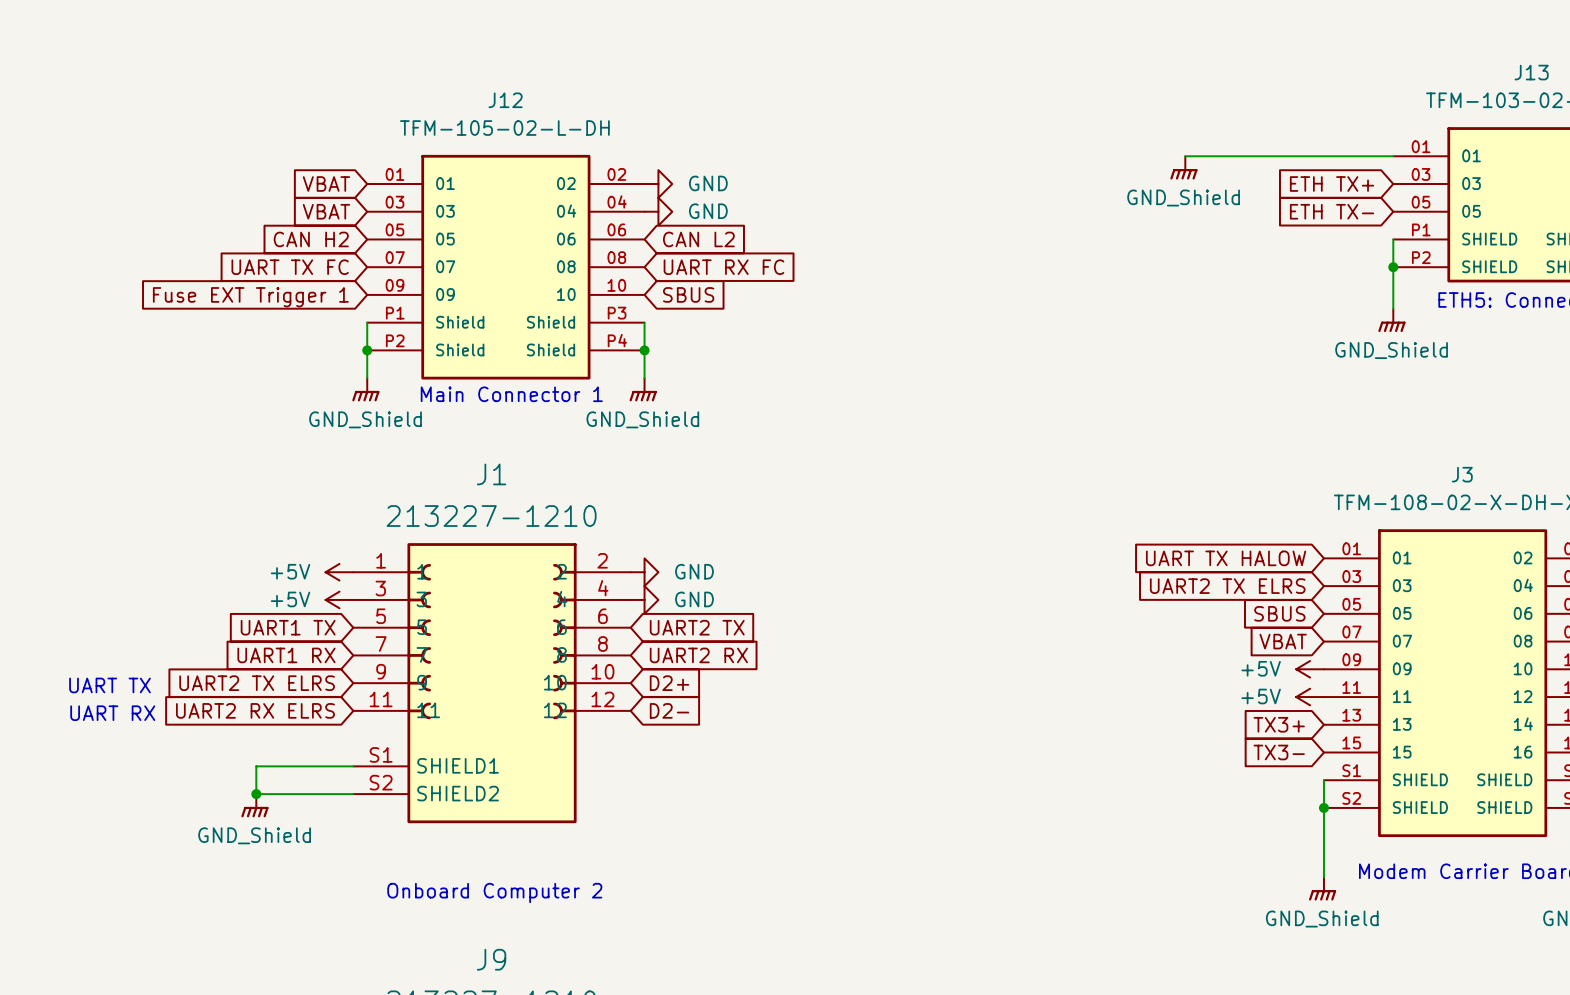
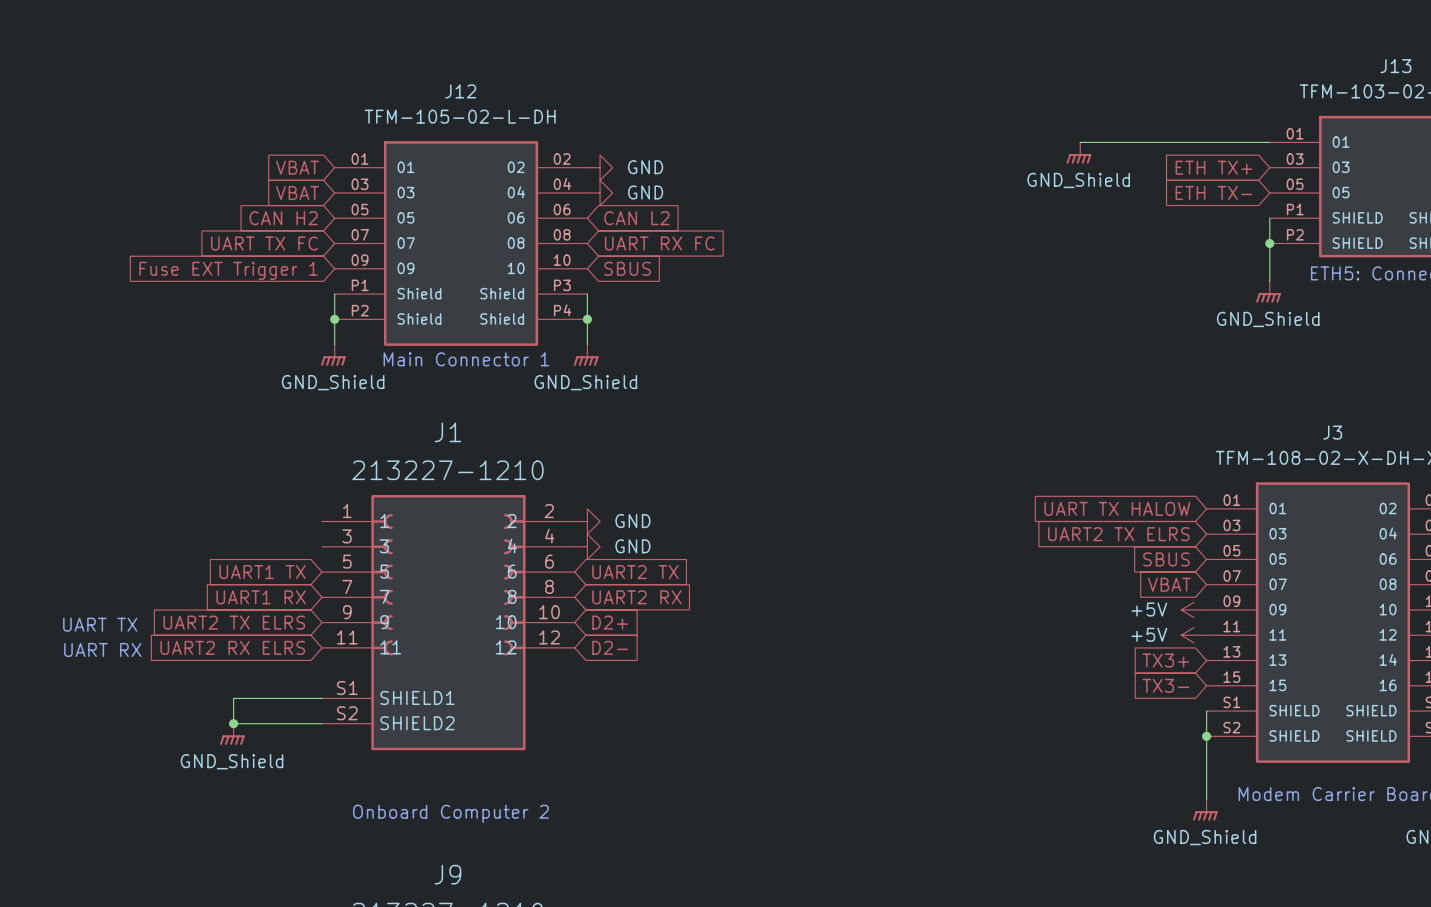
power symbol: +5V (339, 572) -> none
power symbol: +5V (339, 599) -> none

